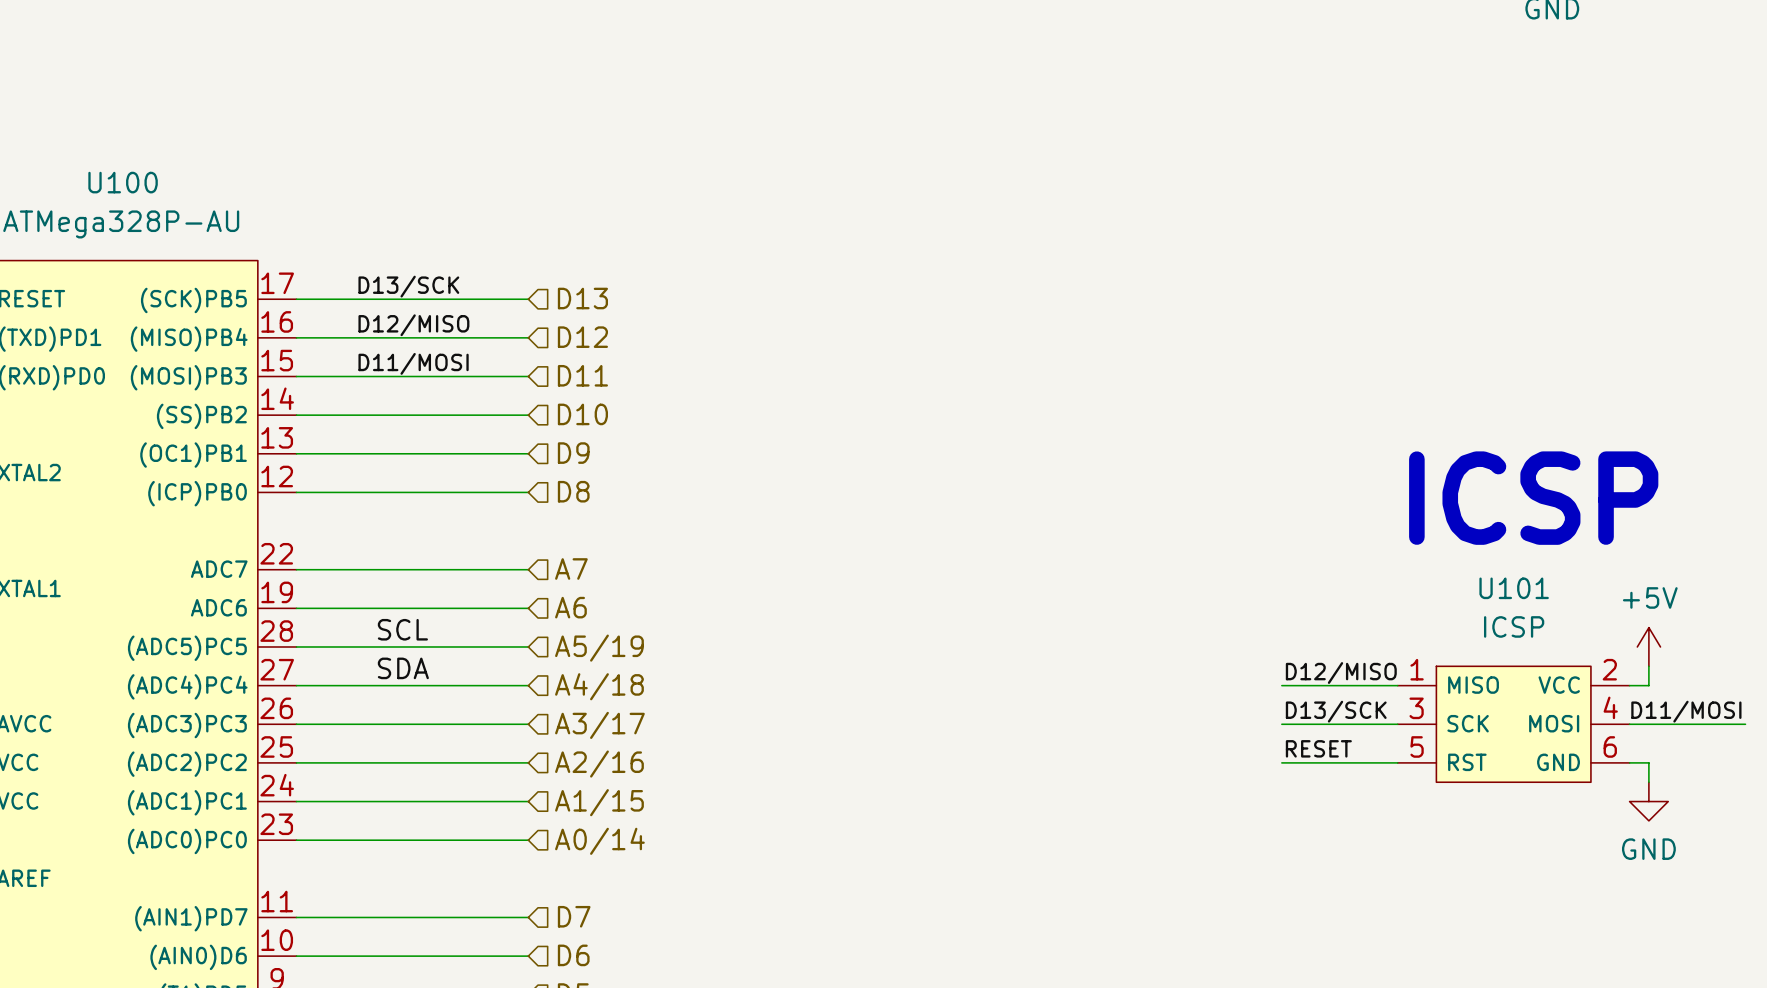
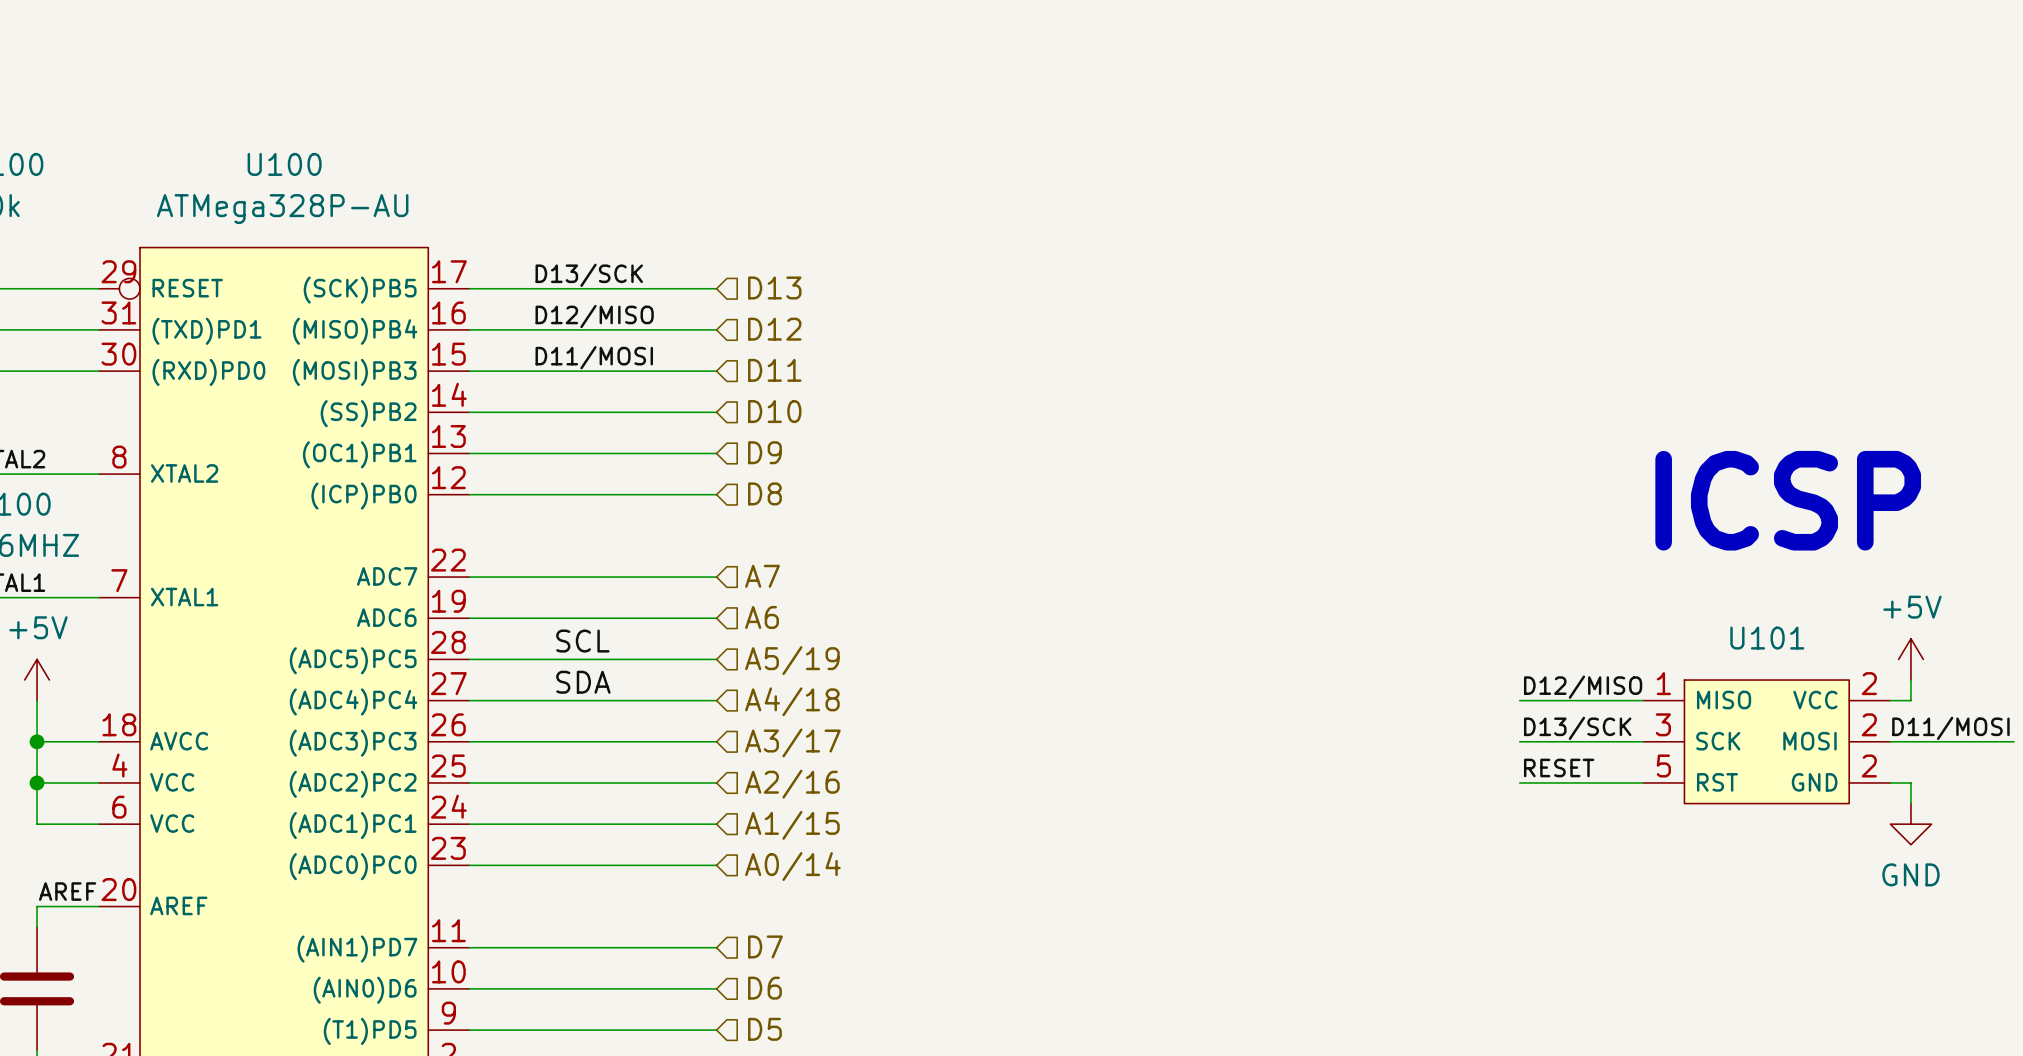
U101 name position: U101 (1514, 588) -> U101 (1767, 638)
U101 value: ICSP (1514, 626) -> none
U101 pin number: 4 (1610, 707) -> 2 (1869, 724)
U101 pin number: 6 (1610, 746) -> 2 (1869, 765)

